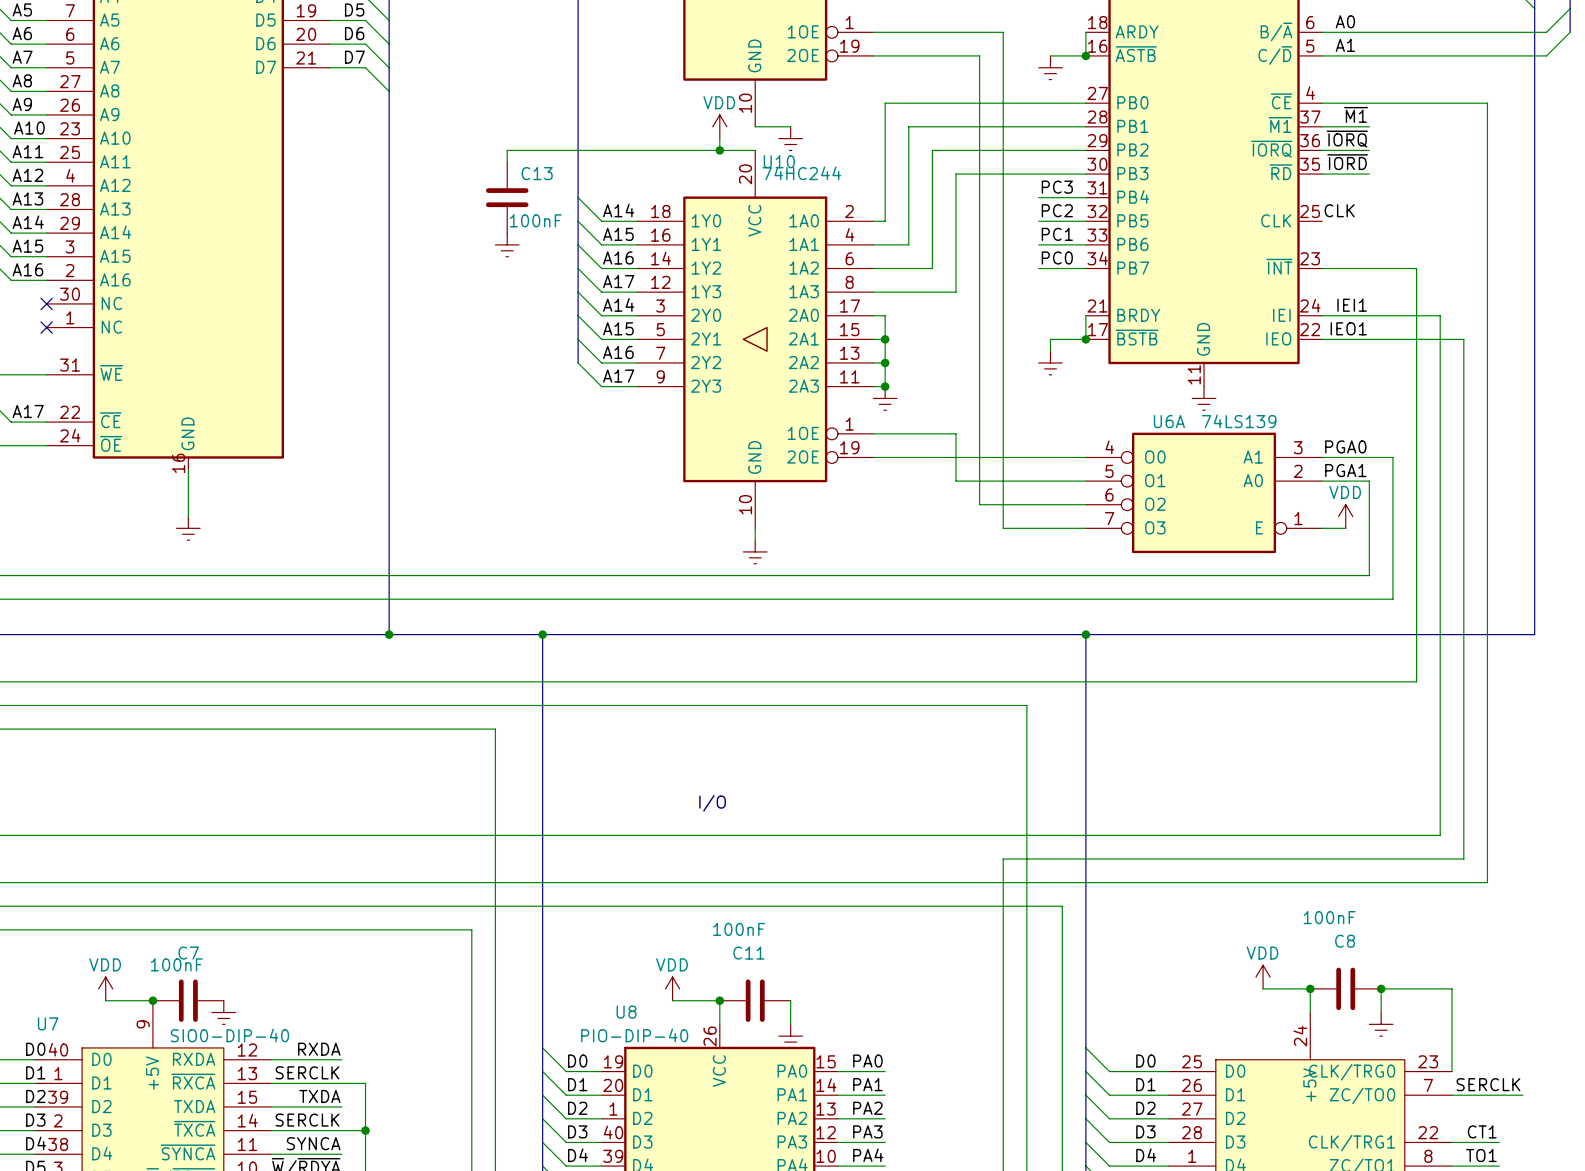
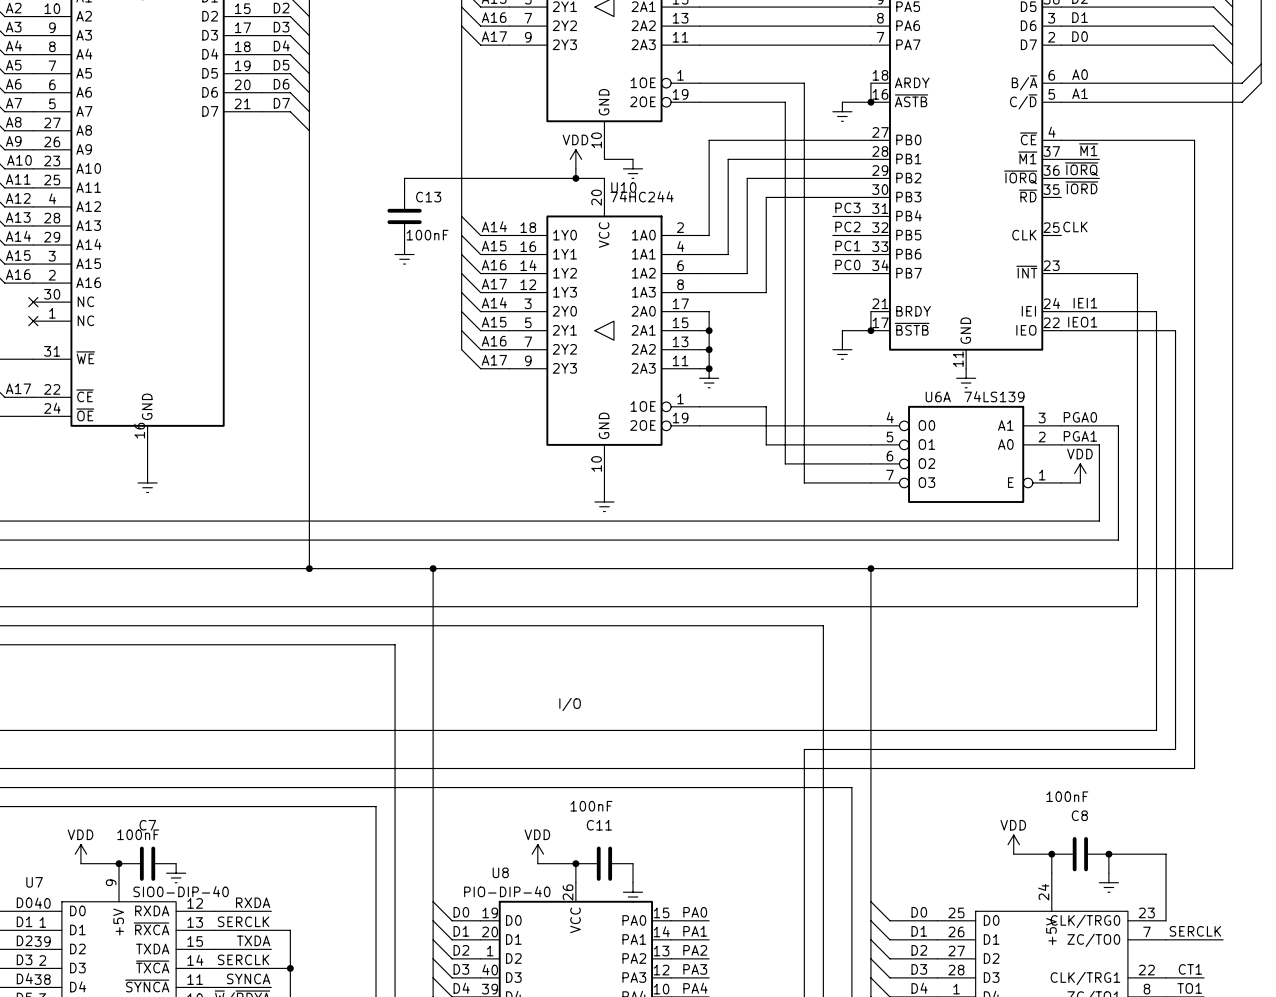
wire: (1322, 174) (1369, 174) -> none

